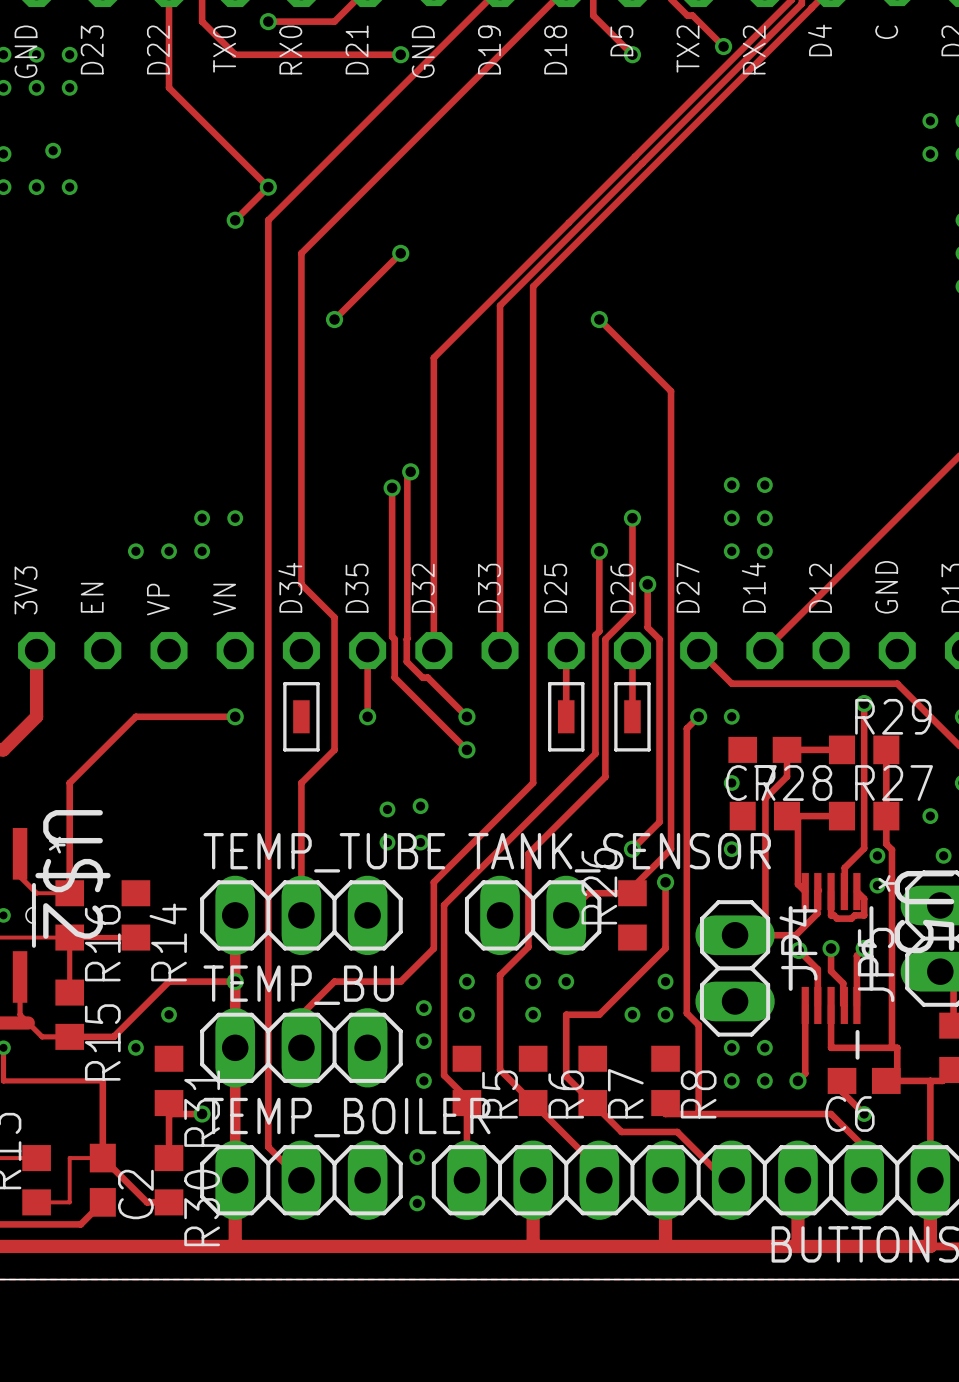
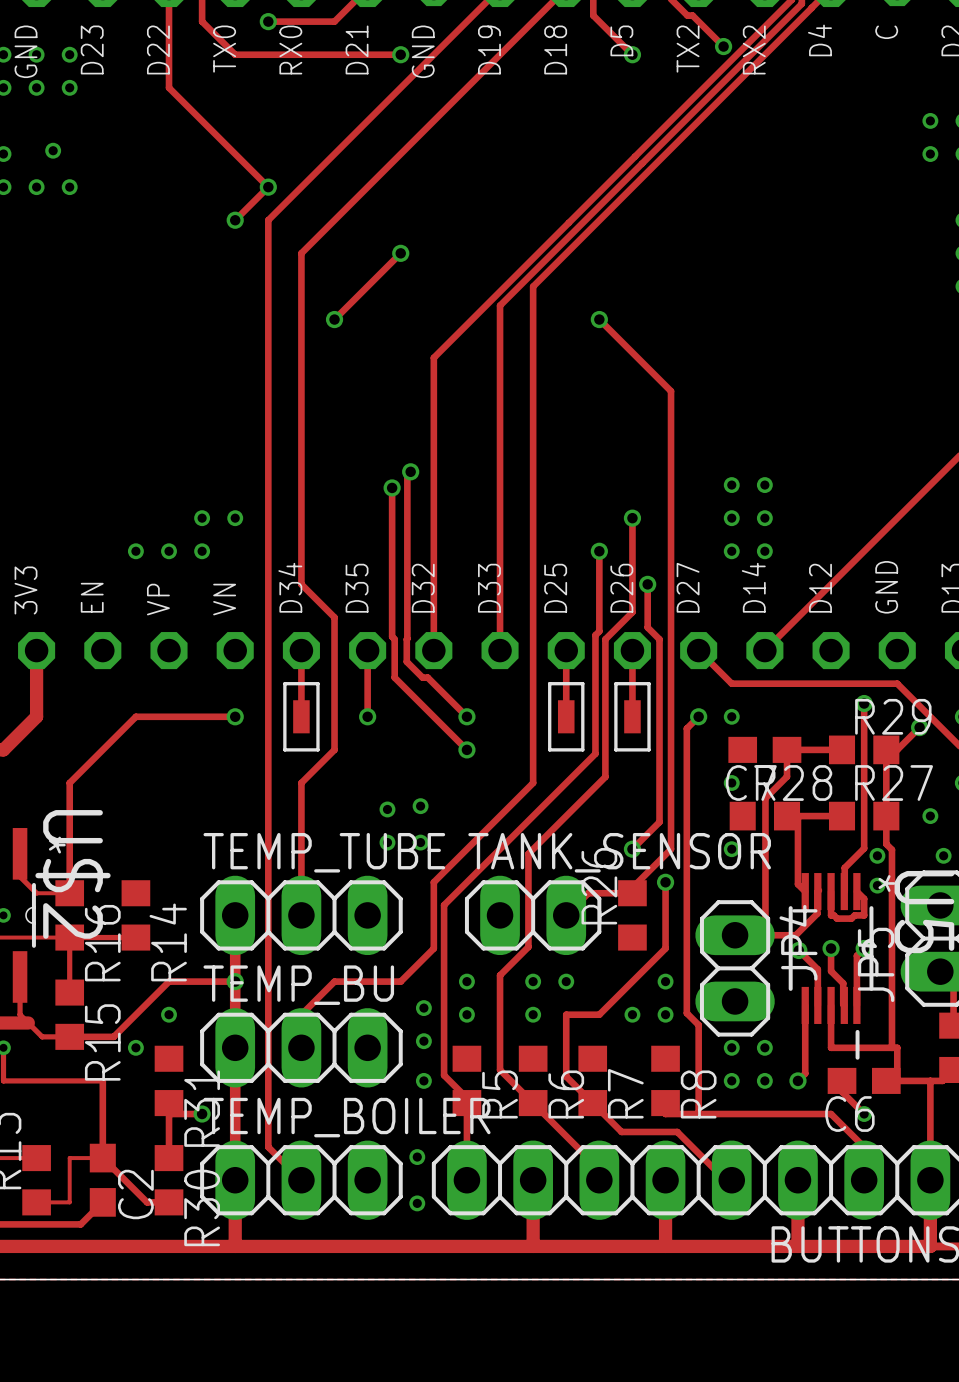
track: none -> (301, 650) (301, 716)
track: none -> (919, 727) (897, 749) (886, 749)
via: none -> (919, 727)

